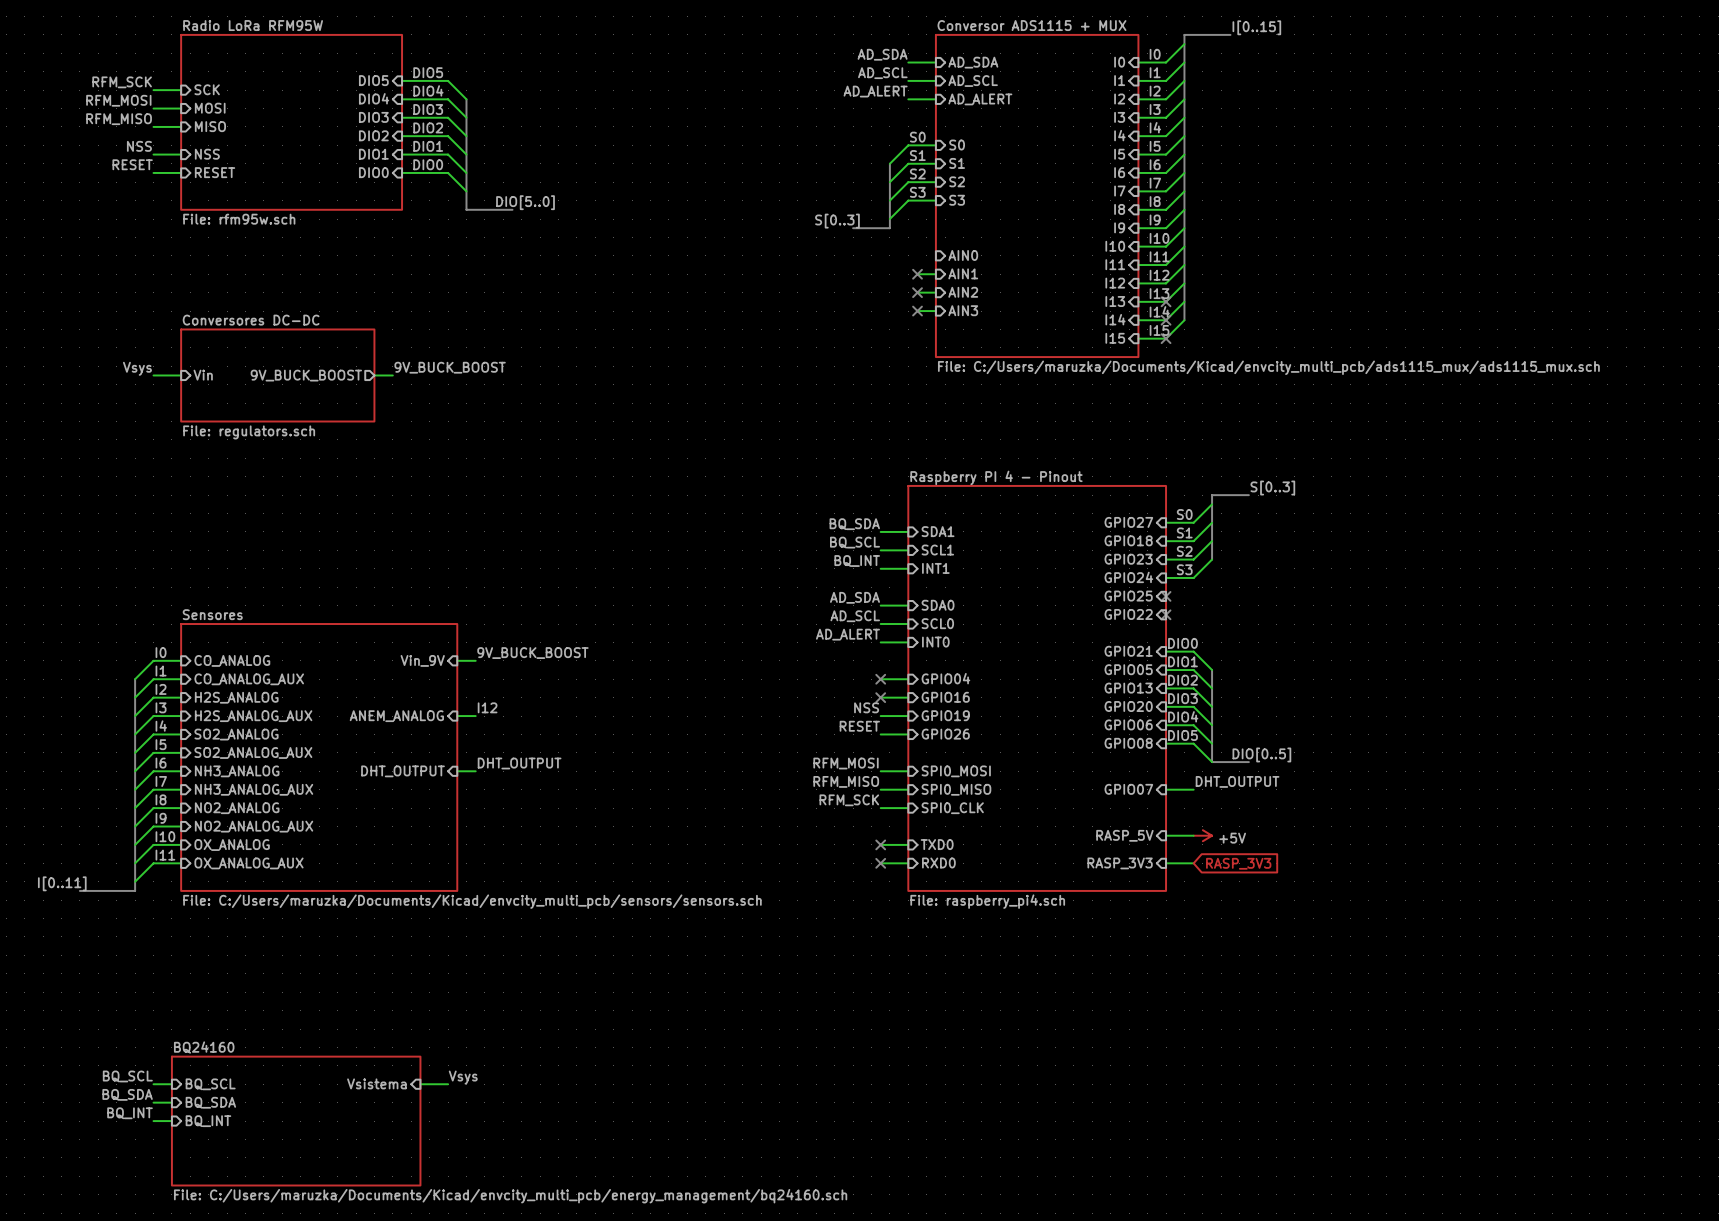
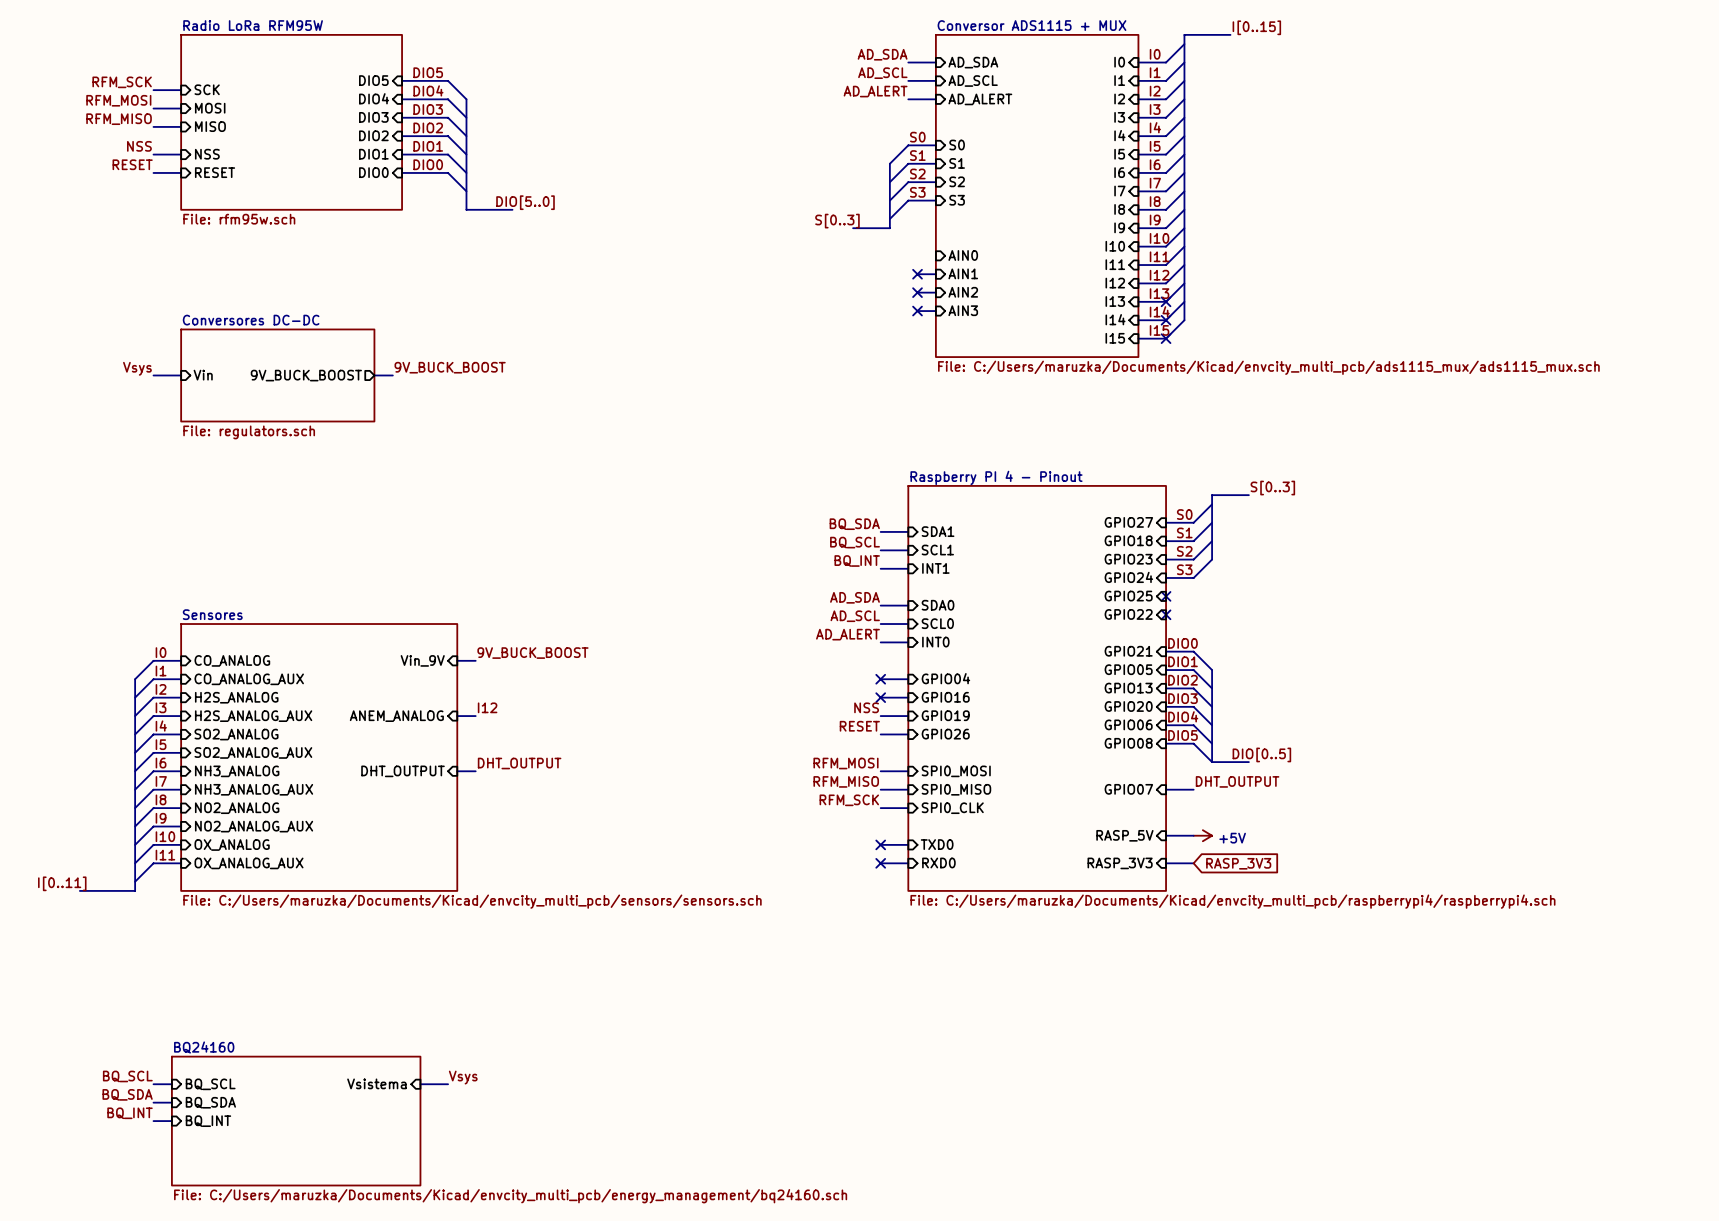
sheet Raspberry PI 4 - Pinout value: File: raspberry_pi4.sch (987, 901) -> File: C:/Users/maruzka/Documents/Kicad/envcity_multi_pcb/raspberrypi4/raspberrypi4.sch (1232, 901)

